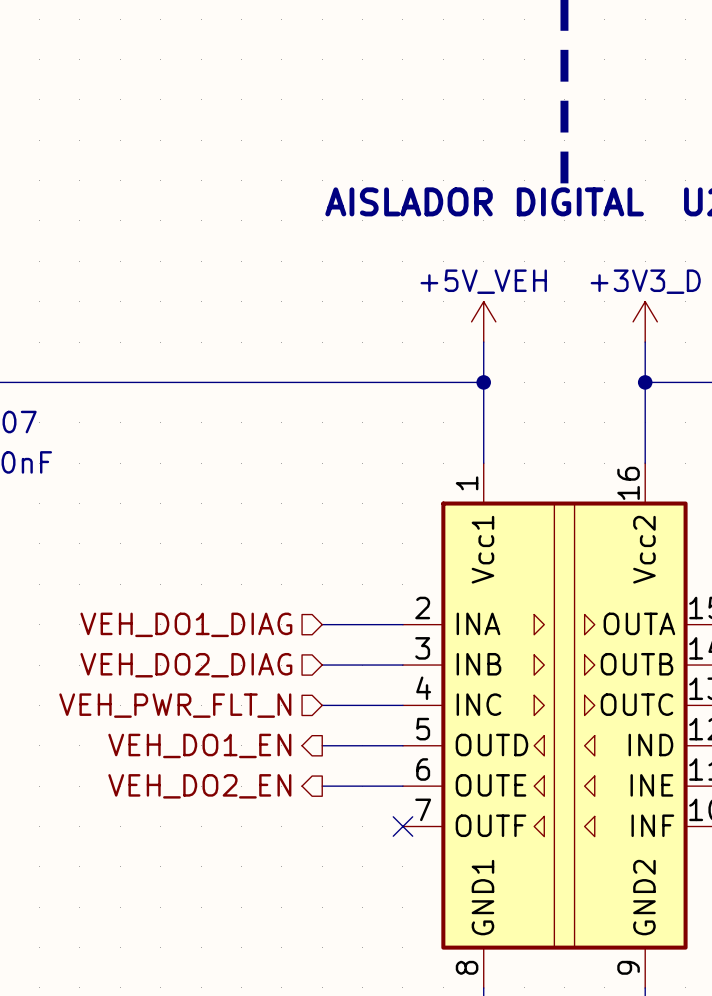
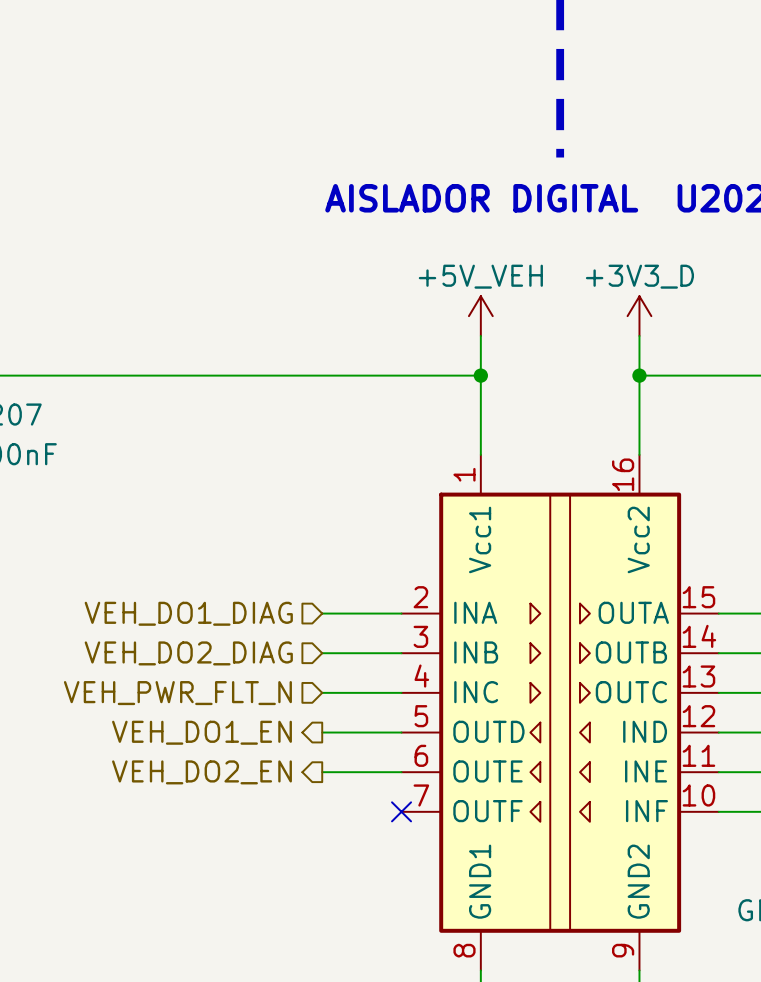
line: (564, 160) (564, 200) -> none

